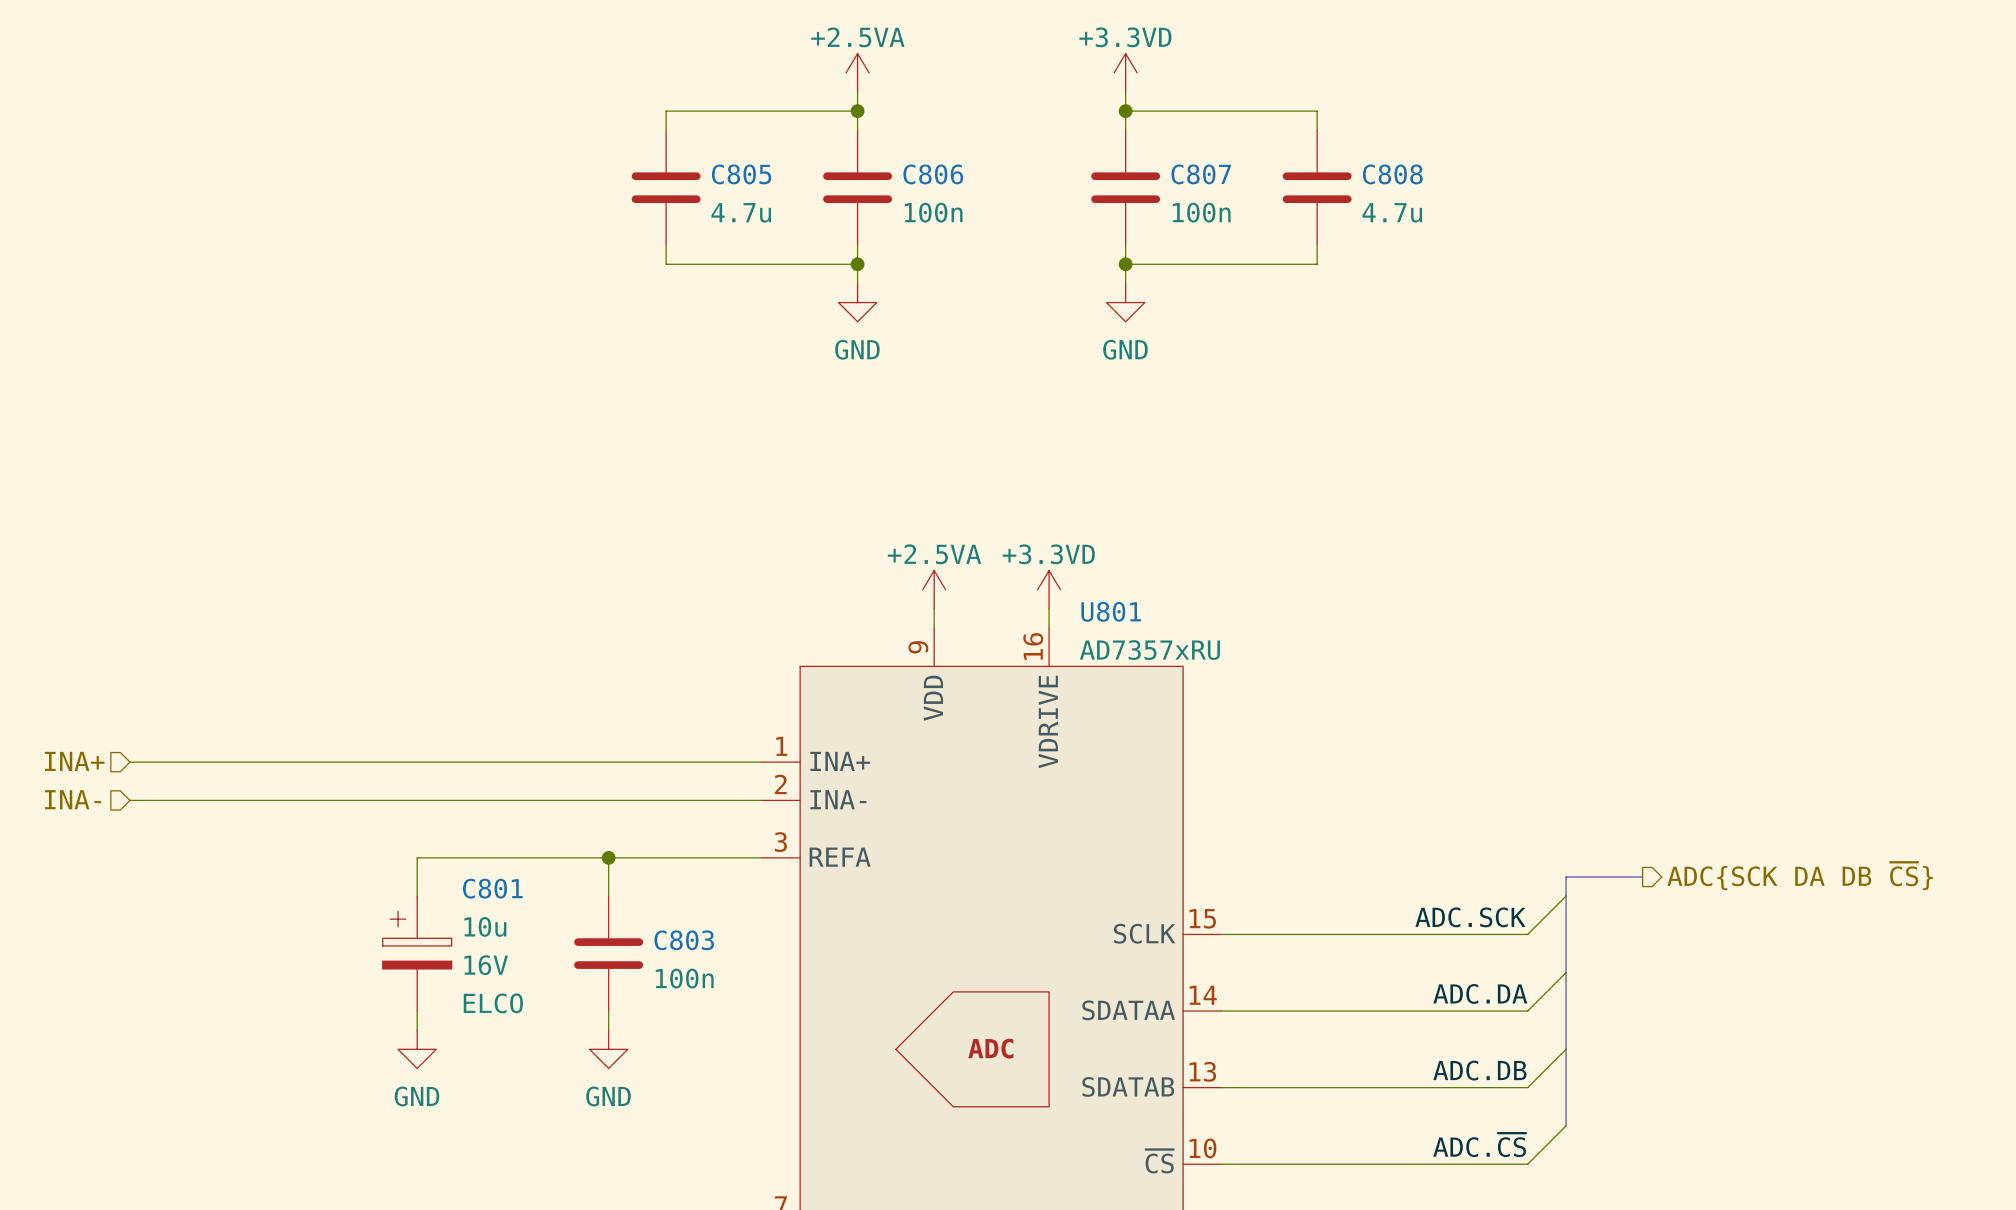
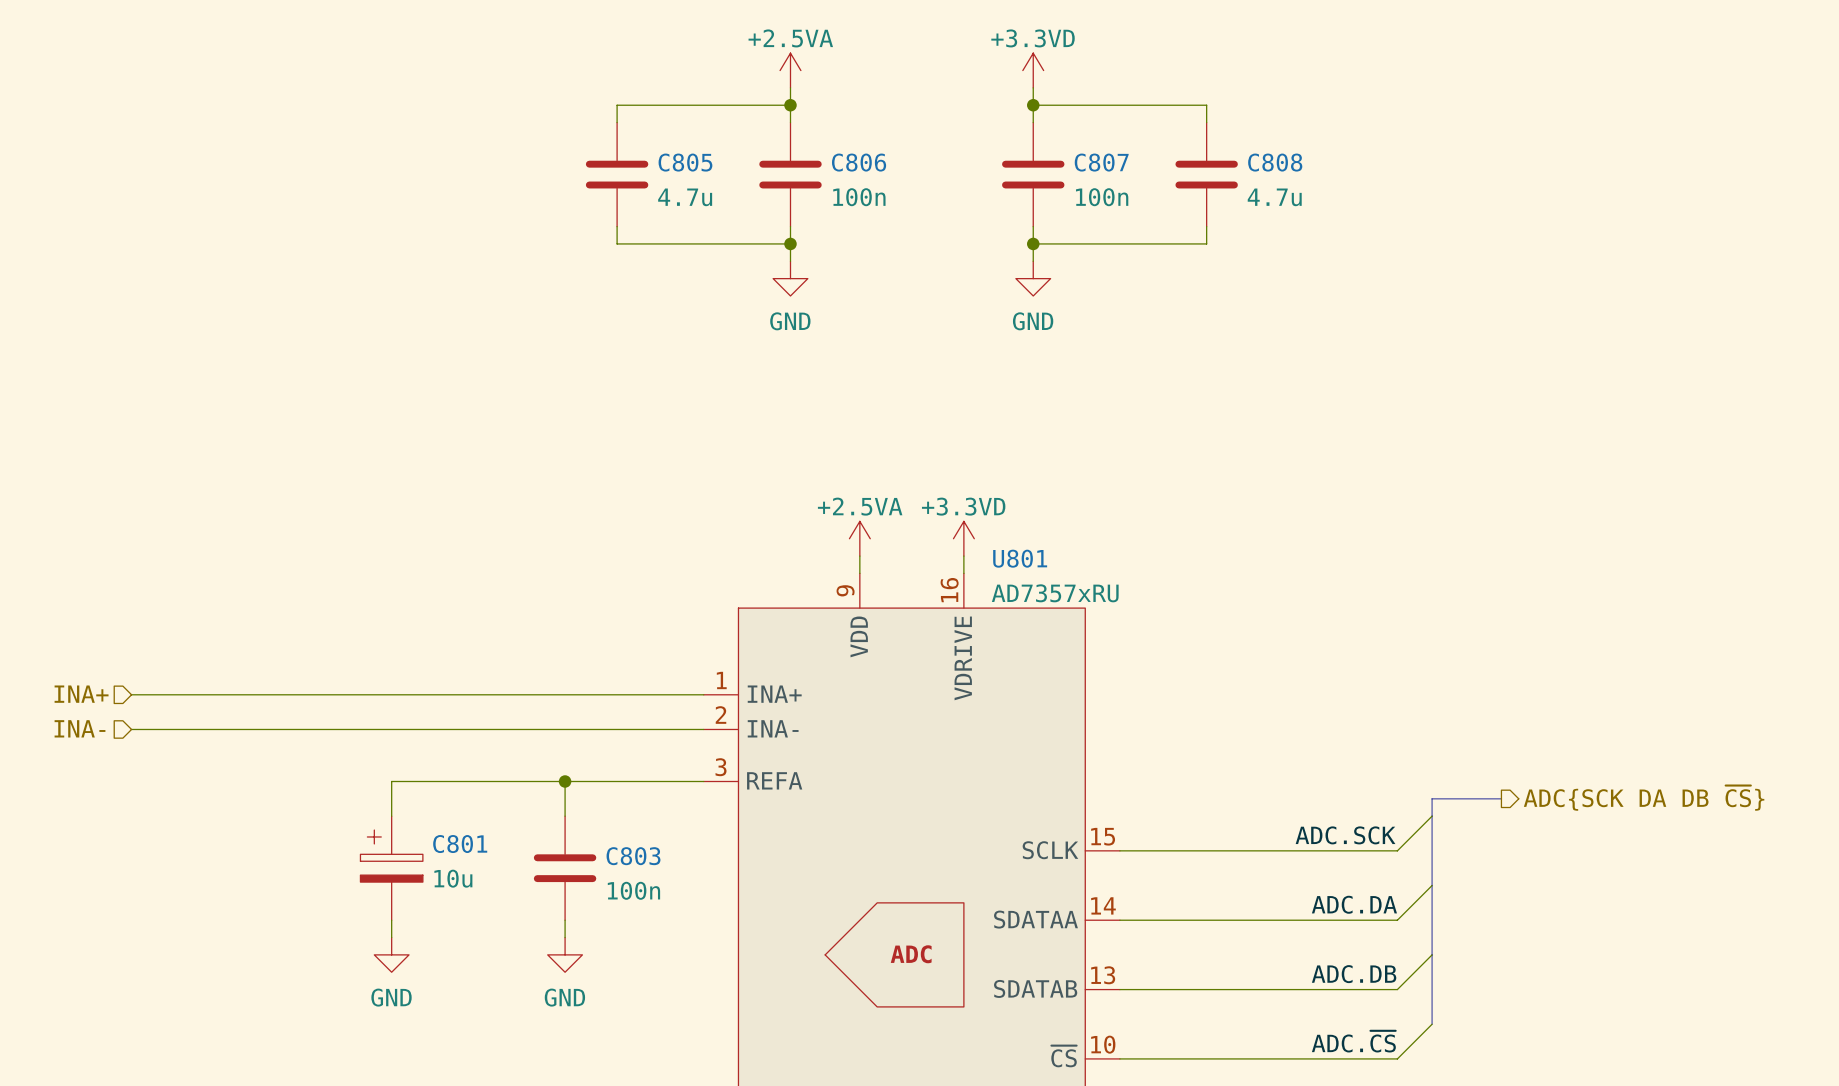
C801 name position: C801 (492, 888) -> C801 (460, 844)
C801 value position: 10u (485, 926) -> 10u (453, 878)
C801 text: 16V (486, 965) -> none
C801 text: ELCO (493, 1003) -> none

